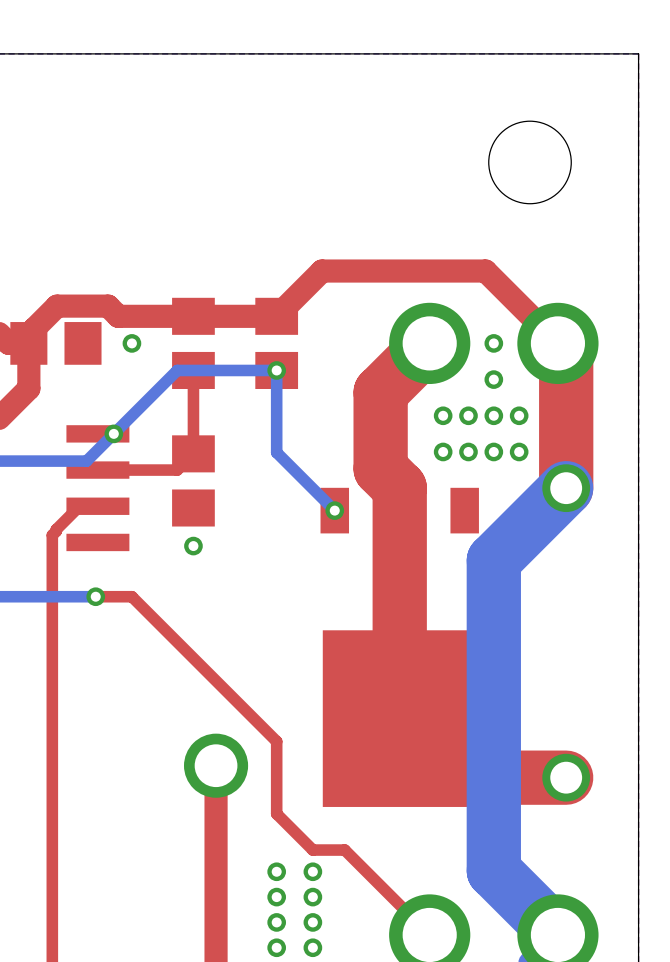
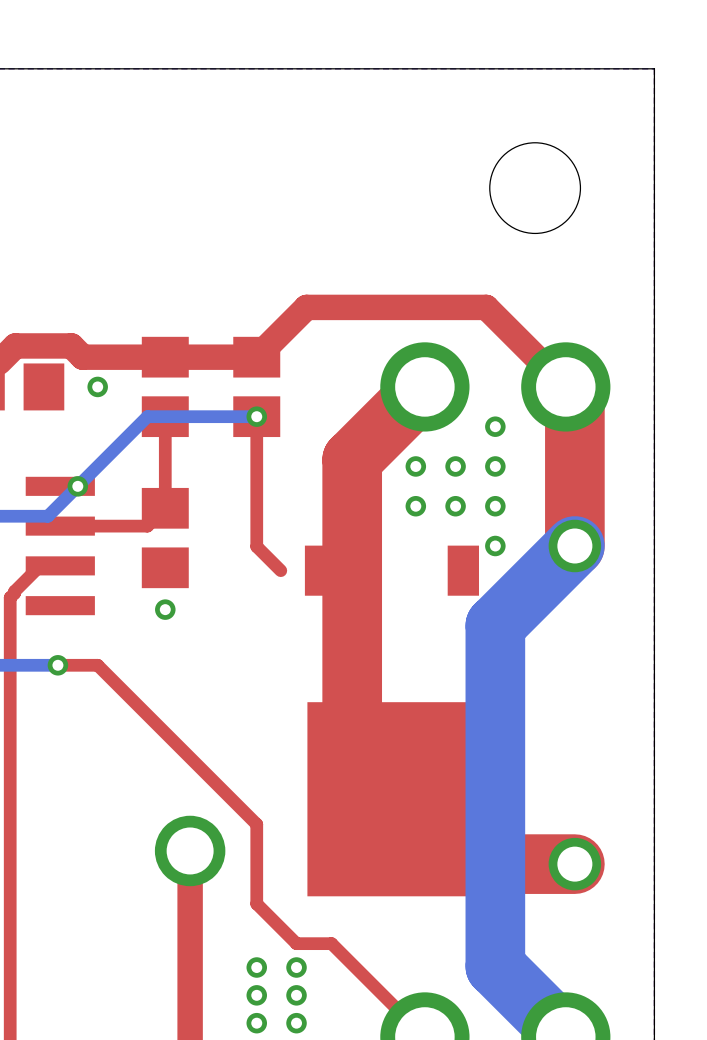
via: (493, 343) -> none
top track: none -> (256, 416) (256, 546) (280, 570)
bottom track: (276, 370) (276, 452) (334, 510) -> none
top track: (380, 392) (380, 468) (399, 487) (399, 718) (422, 777) -> (370, 440) (352, 459) (352, 799) (417, 864)
via: none -> (415, 466)
via: (443, 415) -> none
via: none -> (455, 466)
via: (468, 415) -> none
via: (519, 415) -> none
via: none -> (415, 506)
via: (443, 451) -> none
via: none -> (455, 506)
via: (468, 451) -> none
via: (519, 451) -> none
via: none -> (495, 545)
via: (334, 510) -> none

